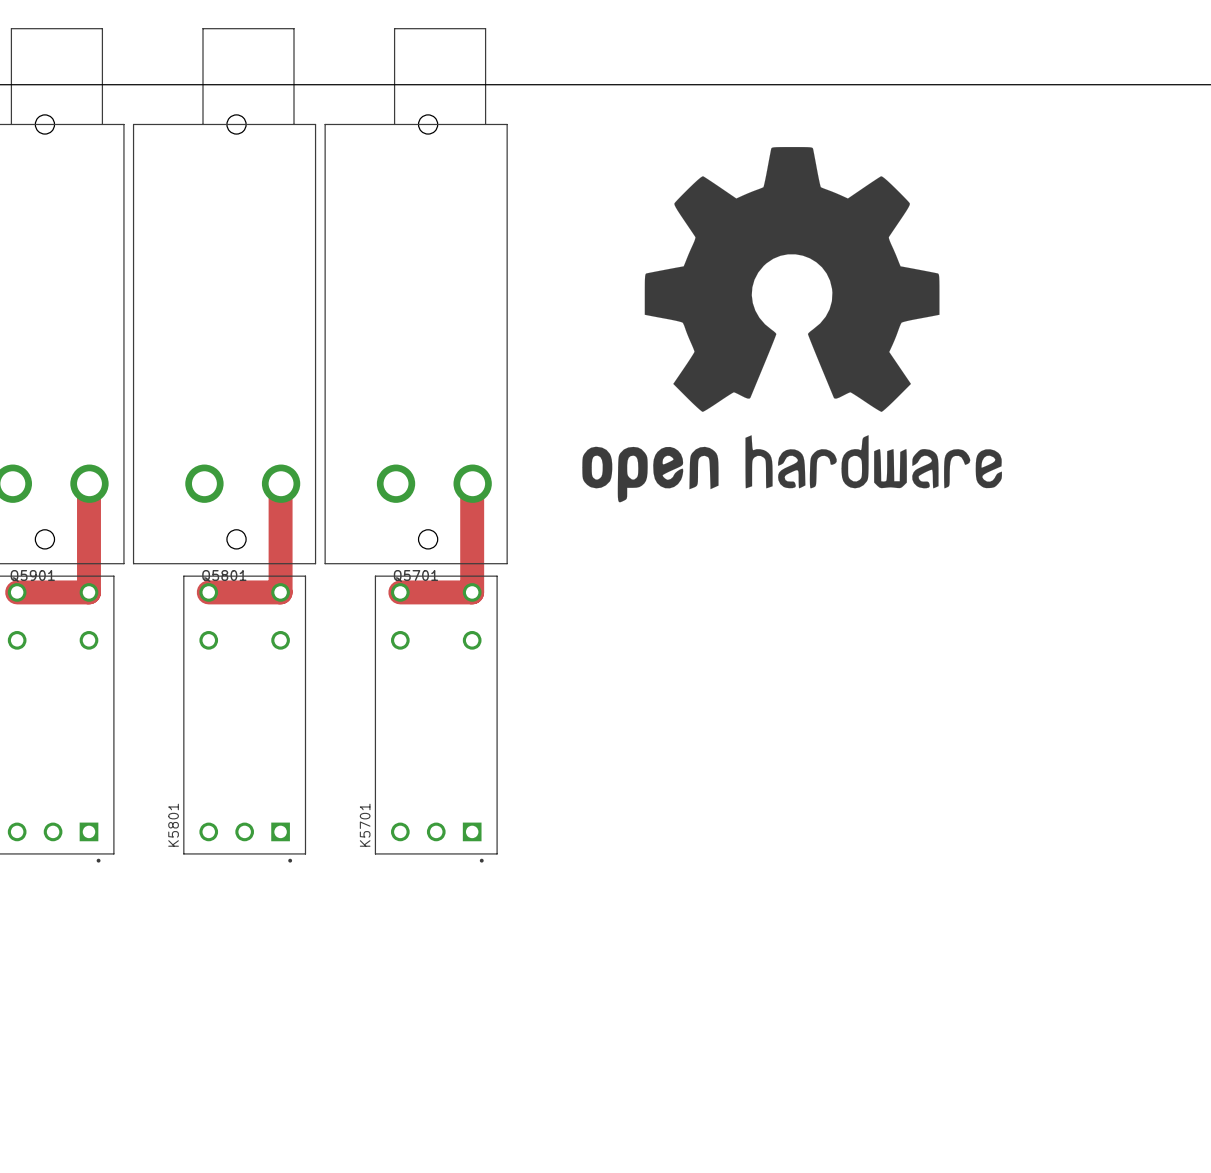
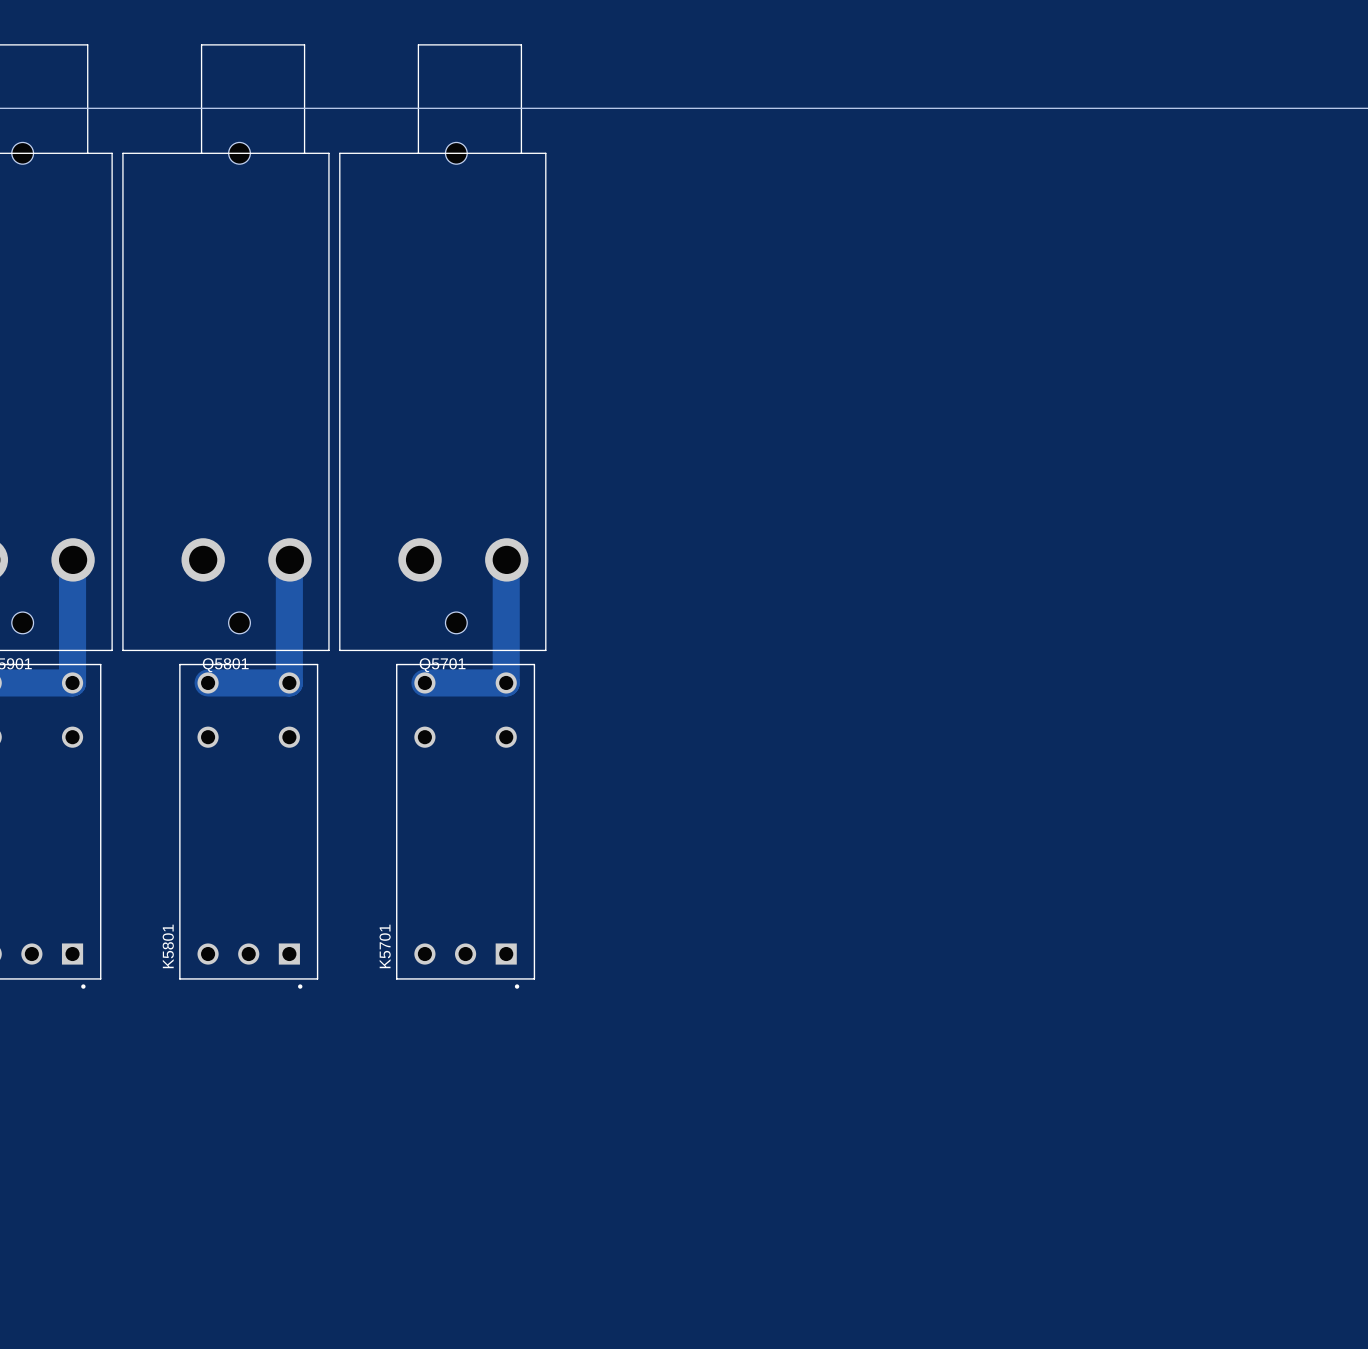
drawing: [582, 147, 1002, 503] -> none

